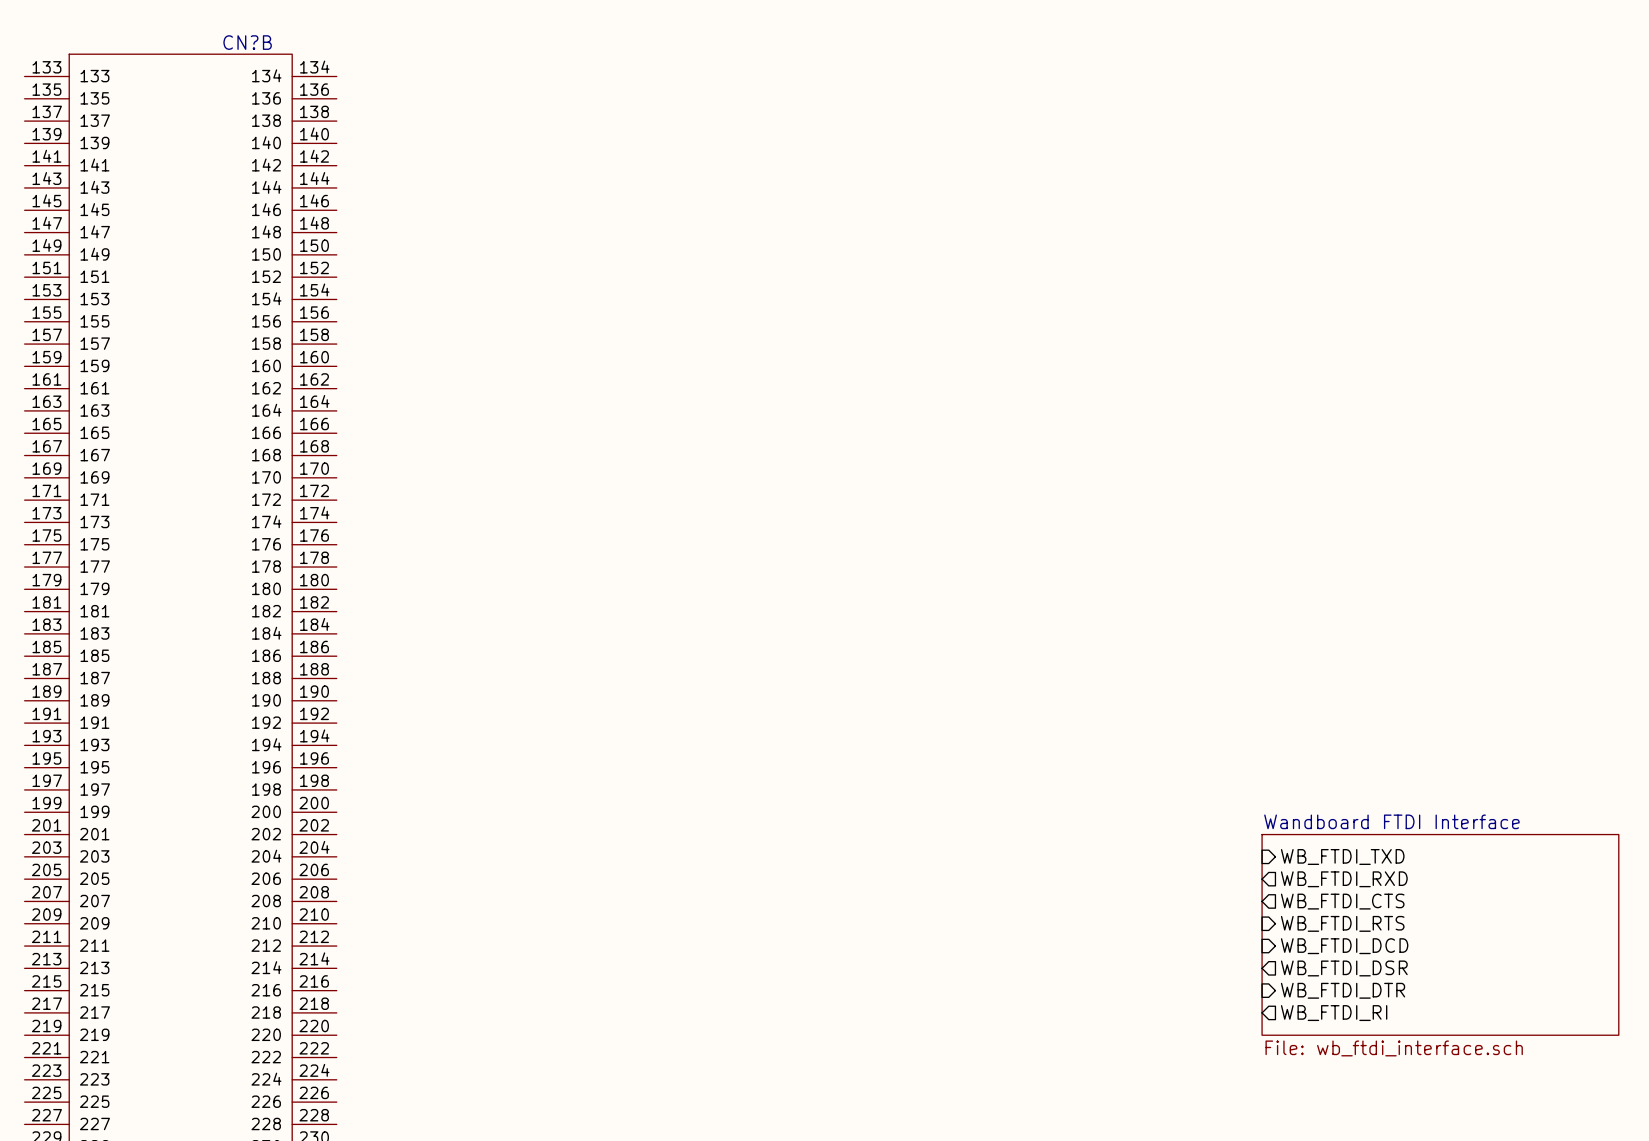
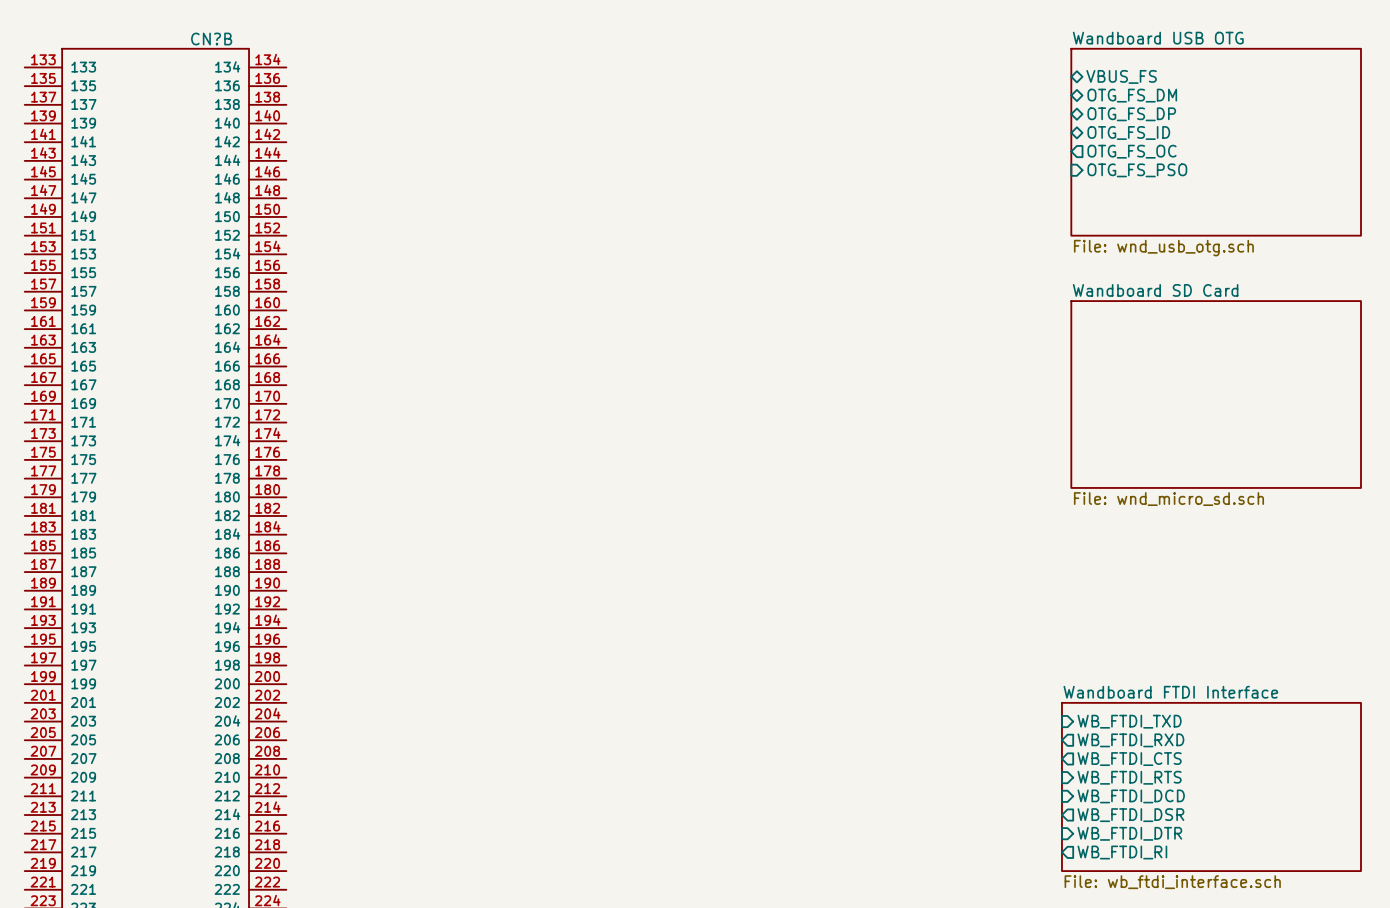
sheet pin: none -> VBUS_FS (1121, 76)
sheet pin: none -> OTG_FS_DM (1132, 95)
sheet pin: none -> OTG_FS_DP (1131, 114)
sheet pin: none -> OTG_FS_ID (1128, 132)
sheet Wandboard USB OTG: none -> File: wnd_usb_otg.sch (1216, 142)
sheet pin: none -> OTG_FS_OC (1131, 151)
sheet pin: none -> OTG_FS_PSO (1137, 170)
sheet Wandboard SD Card: none -> File: wnd_micro_sd.sch (1216, 394)

